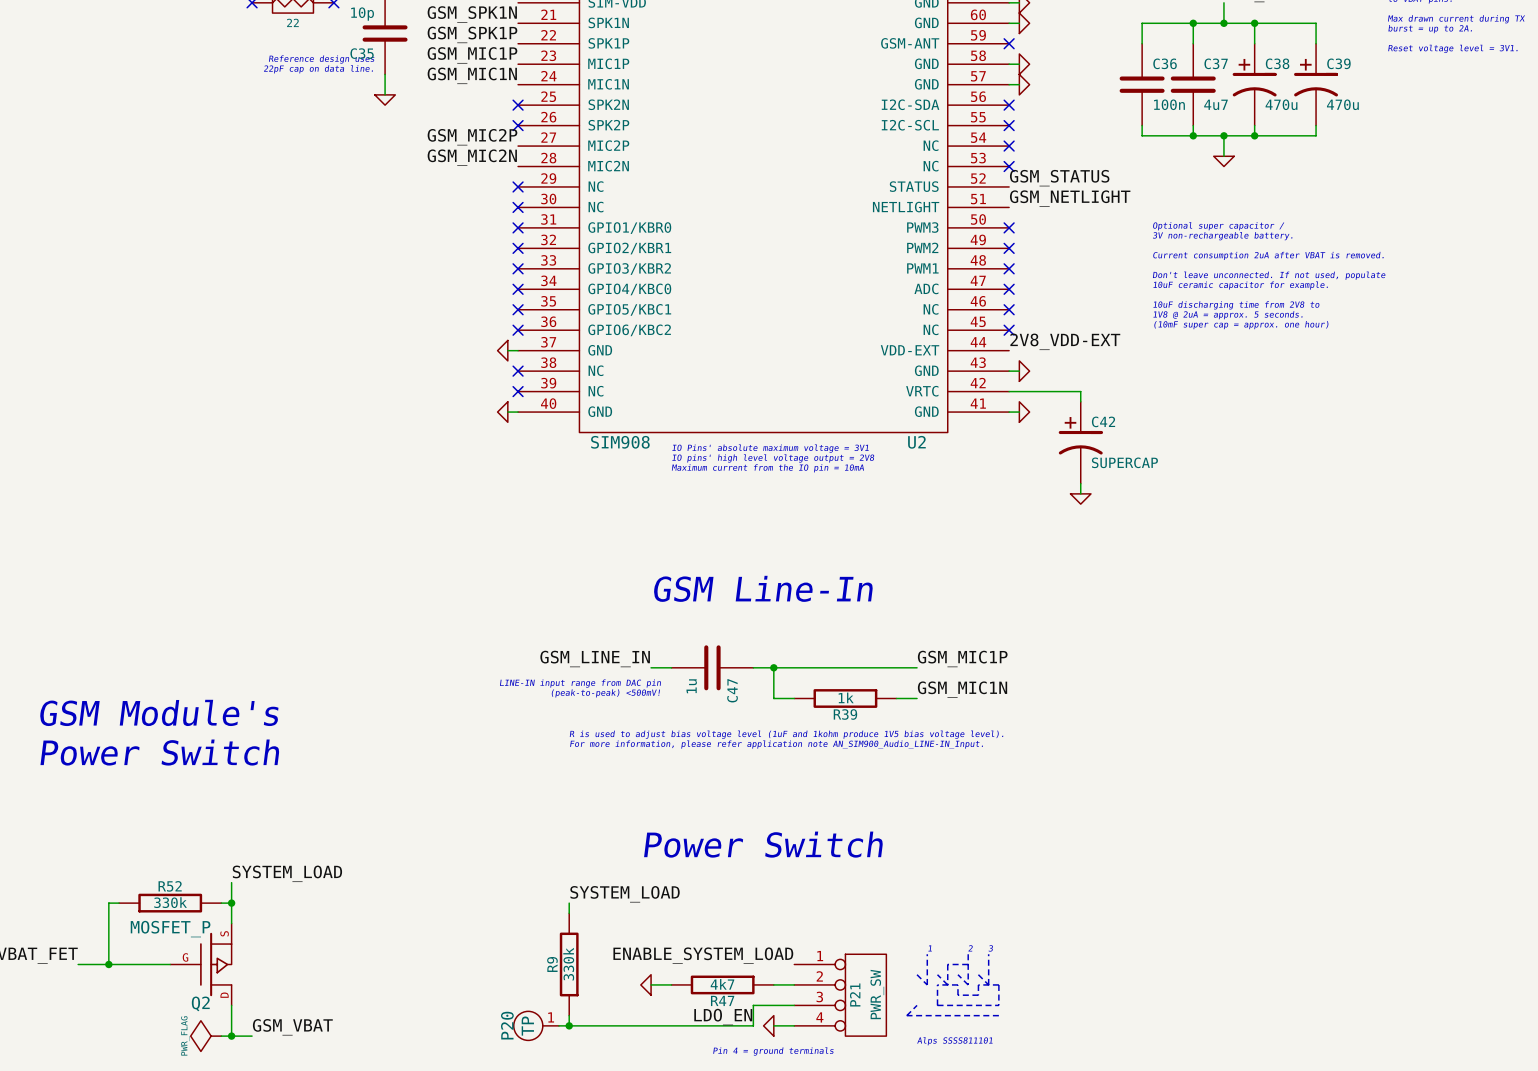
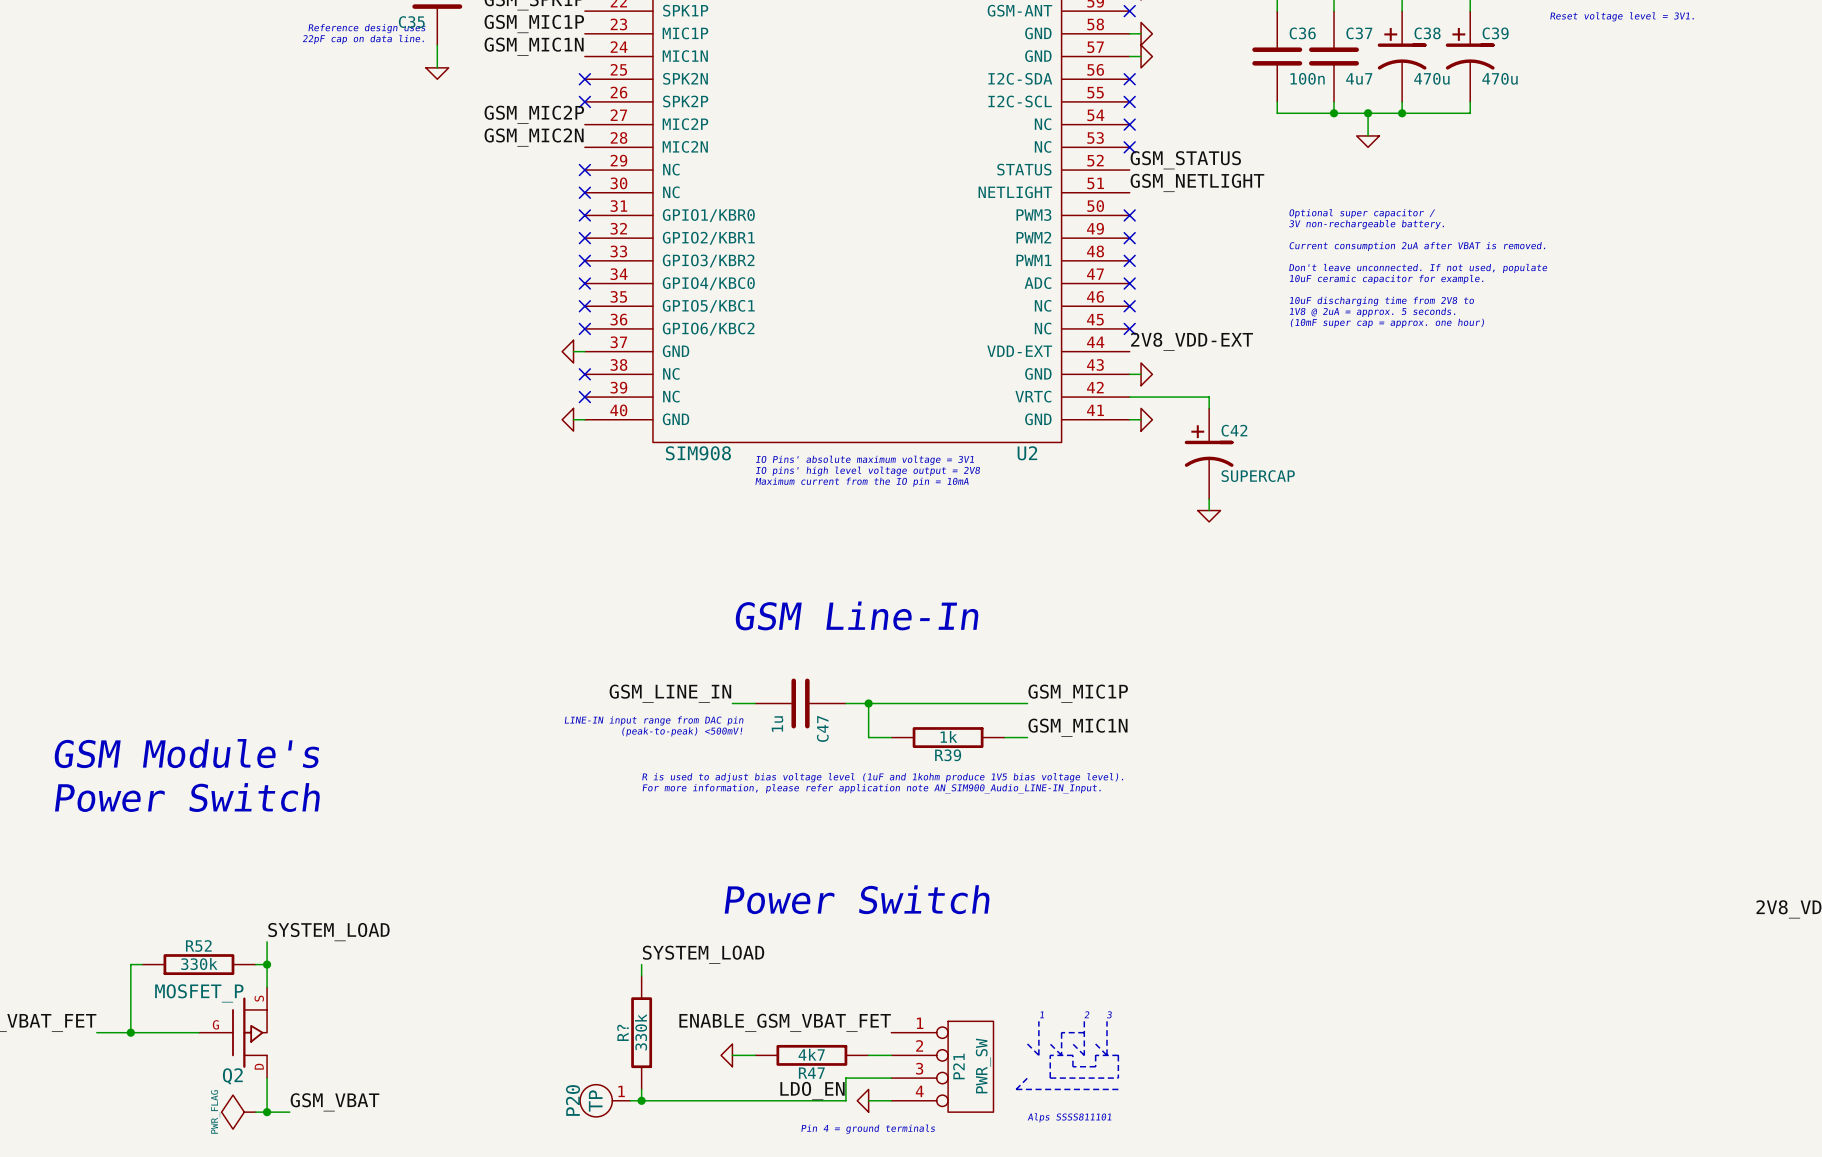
label: ENABLE_SYSTEM_LOAD (703, 955) -> ENABLE_GSM_VBAT_FET (785, 1022)
R9 name: R9 (552, 964) -> R? (622, 1032)

